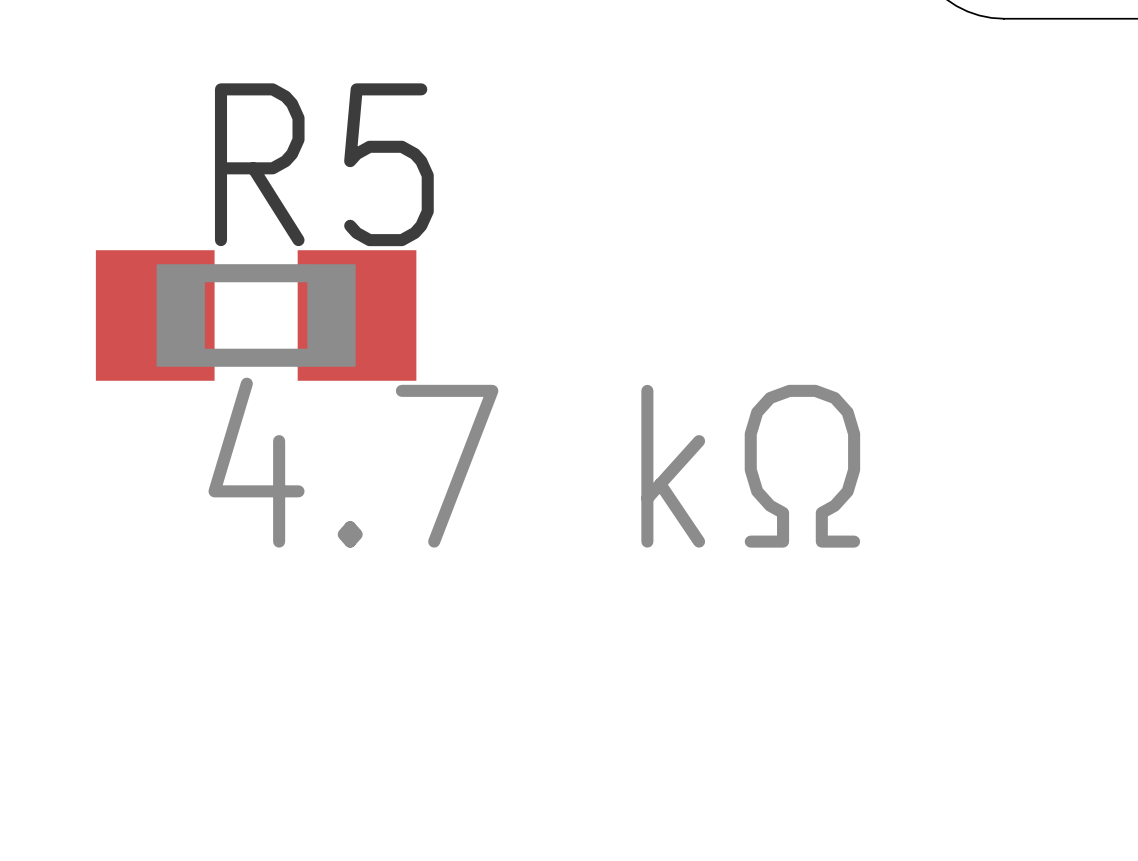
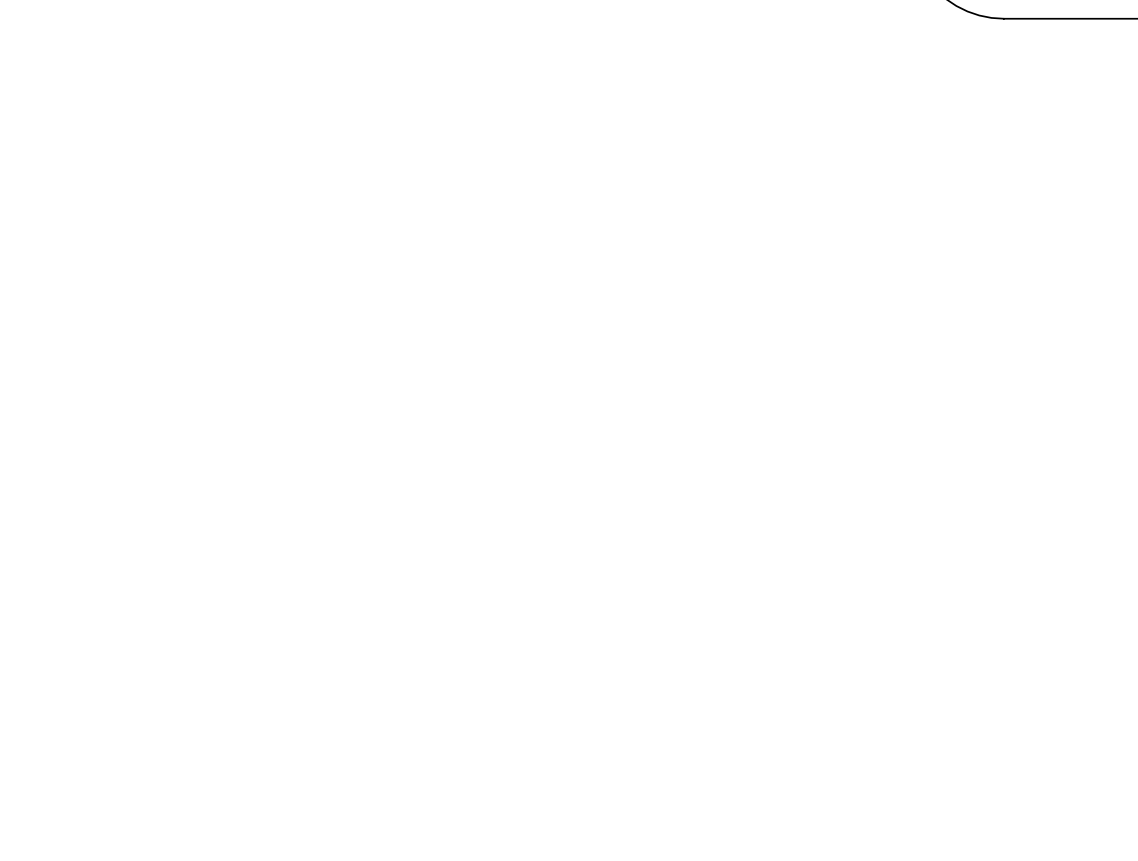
R5: 4.7 kΩ (256, 315) -> none

